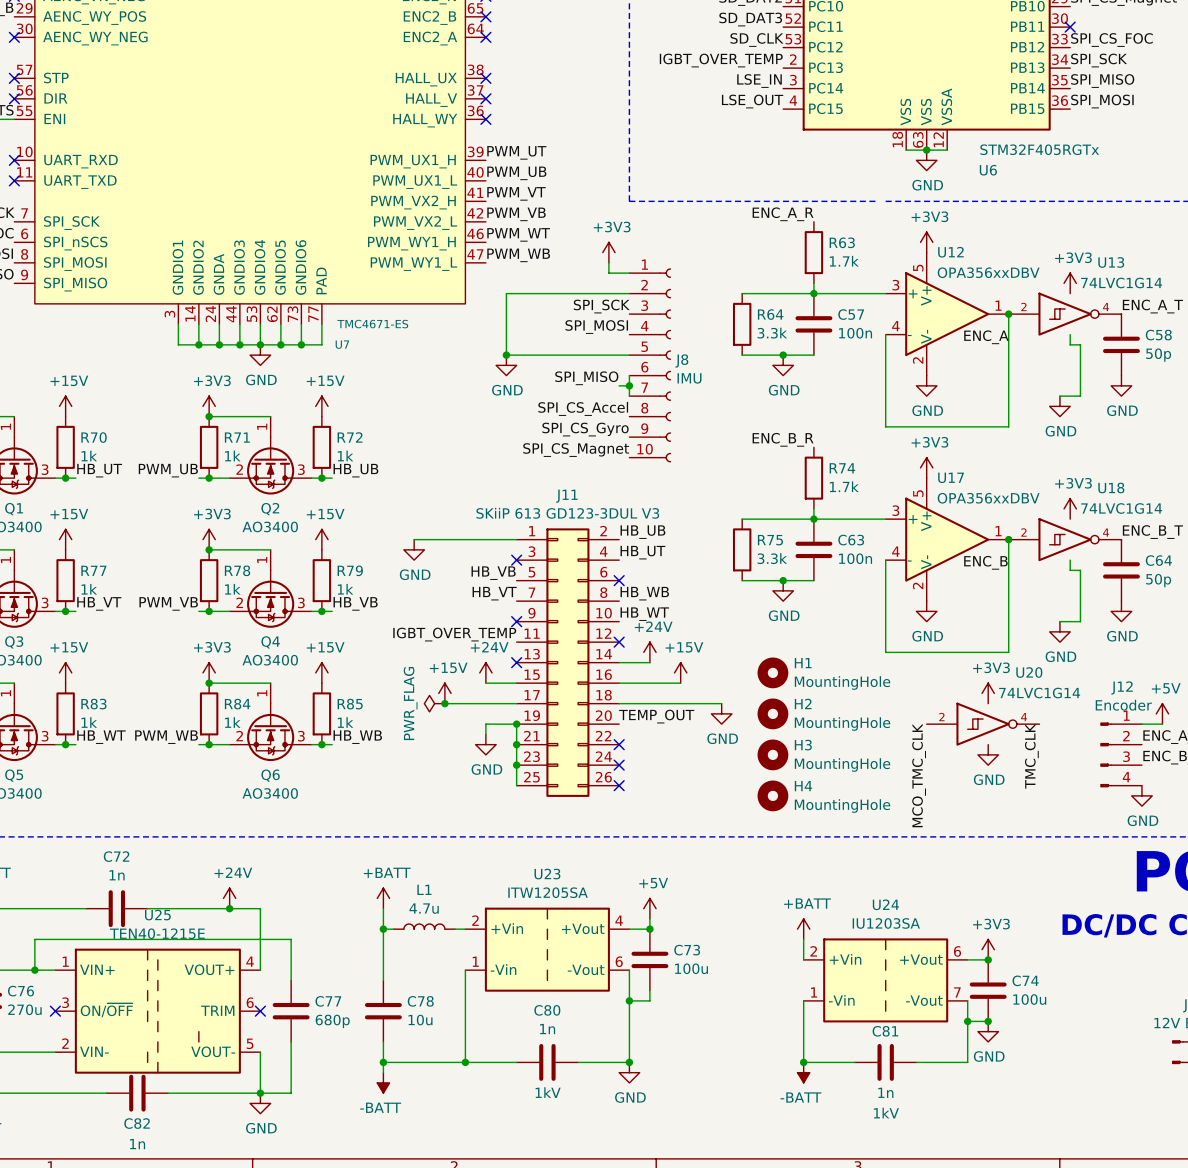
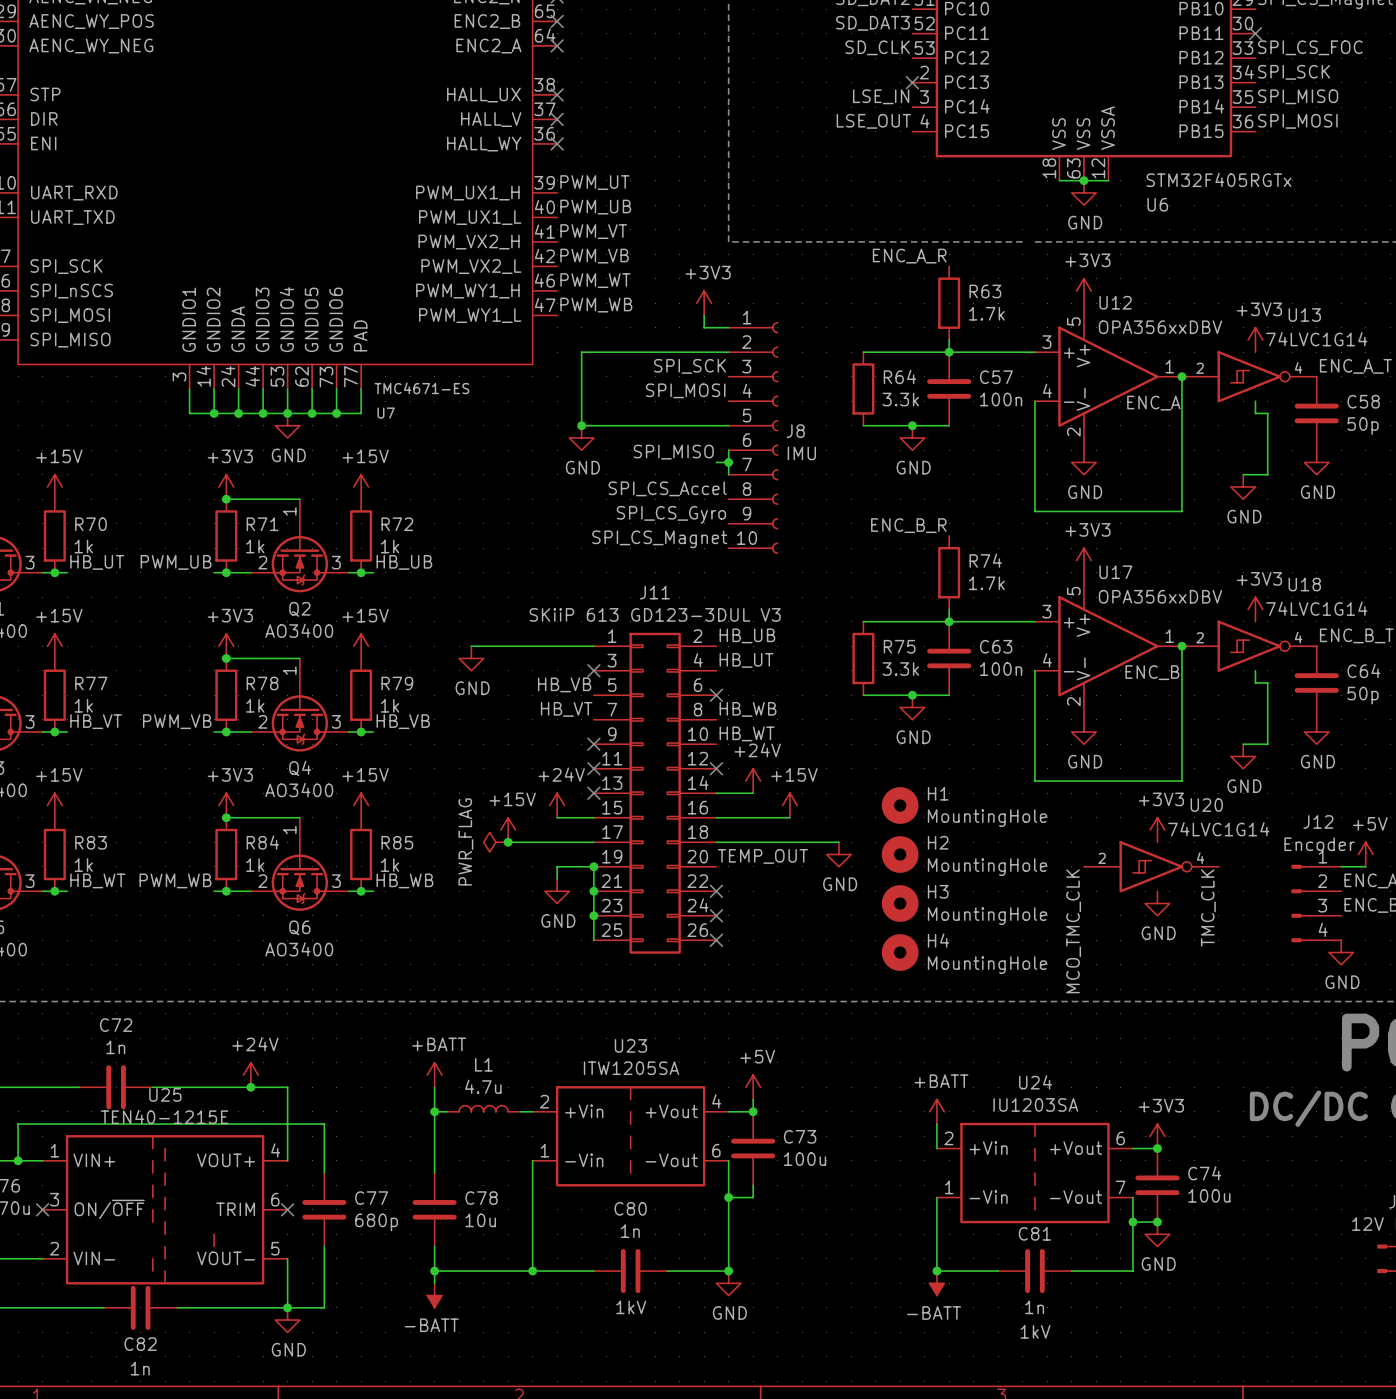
label: IGBT_OVER_TEMP (721, 60) -> none
no-connect mark: none -> (912, 82)
label: IGBT_OVER_TEMP (454, 634) -> none
no-connect mark: none -> (593, 768)

